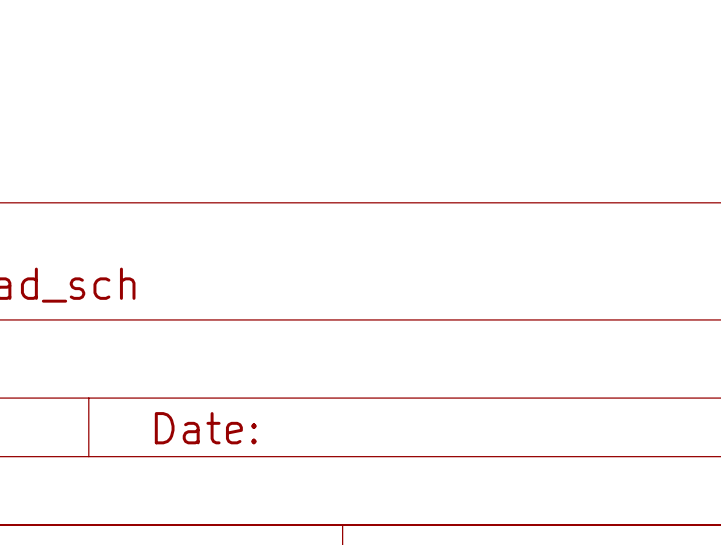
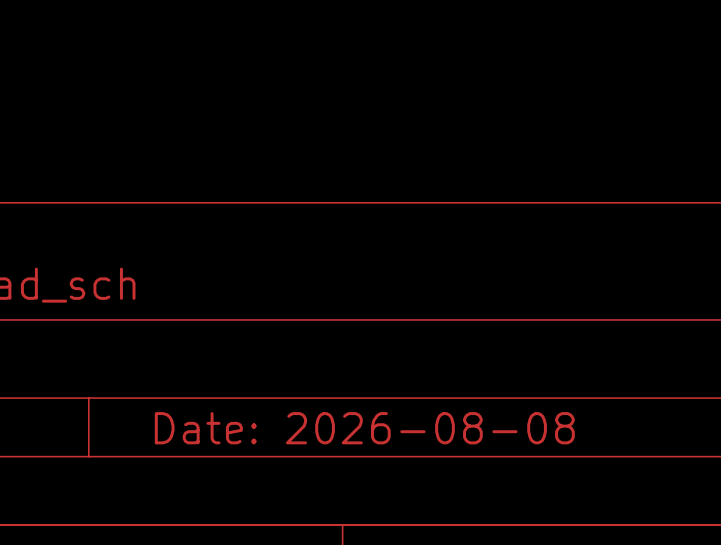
title block: Date: (205, 428) -> Date: 2026-08-08 (364, 428)

